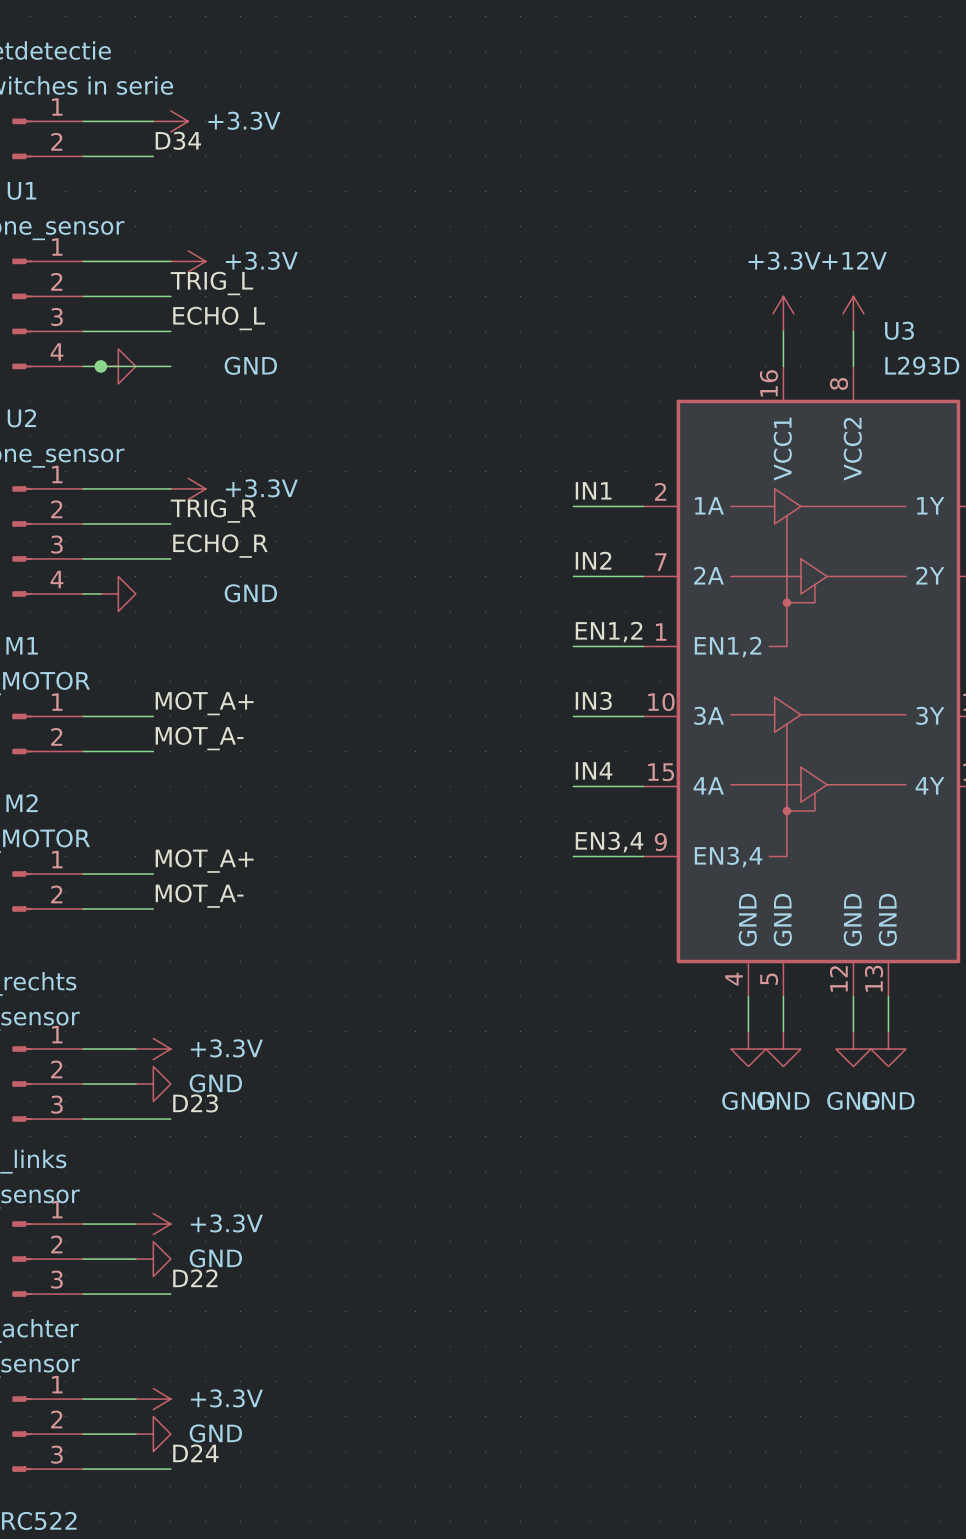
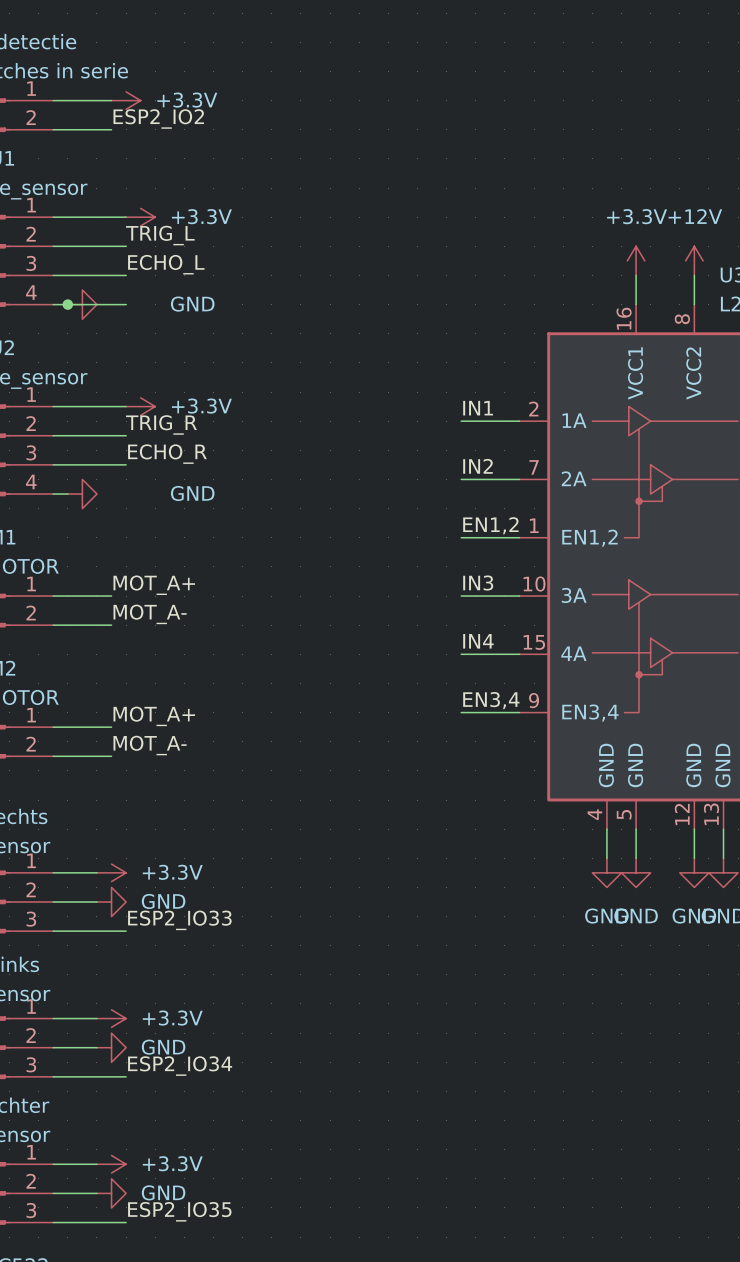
label: D34 (178, 140) -> ESP2_IO2 (158, 118)
label: D23 (195, 1103) -> ESP2_IO33 (179, 920)
label: D22 (195, 1278) -> ESP2_IO34 (180, 1066)
label: D24 (195, 1453) -> ESP2_IO35 (179, 1211)

